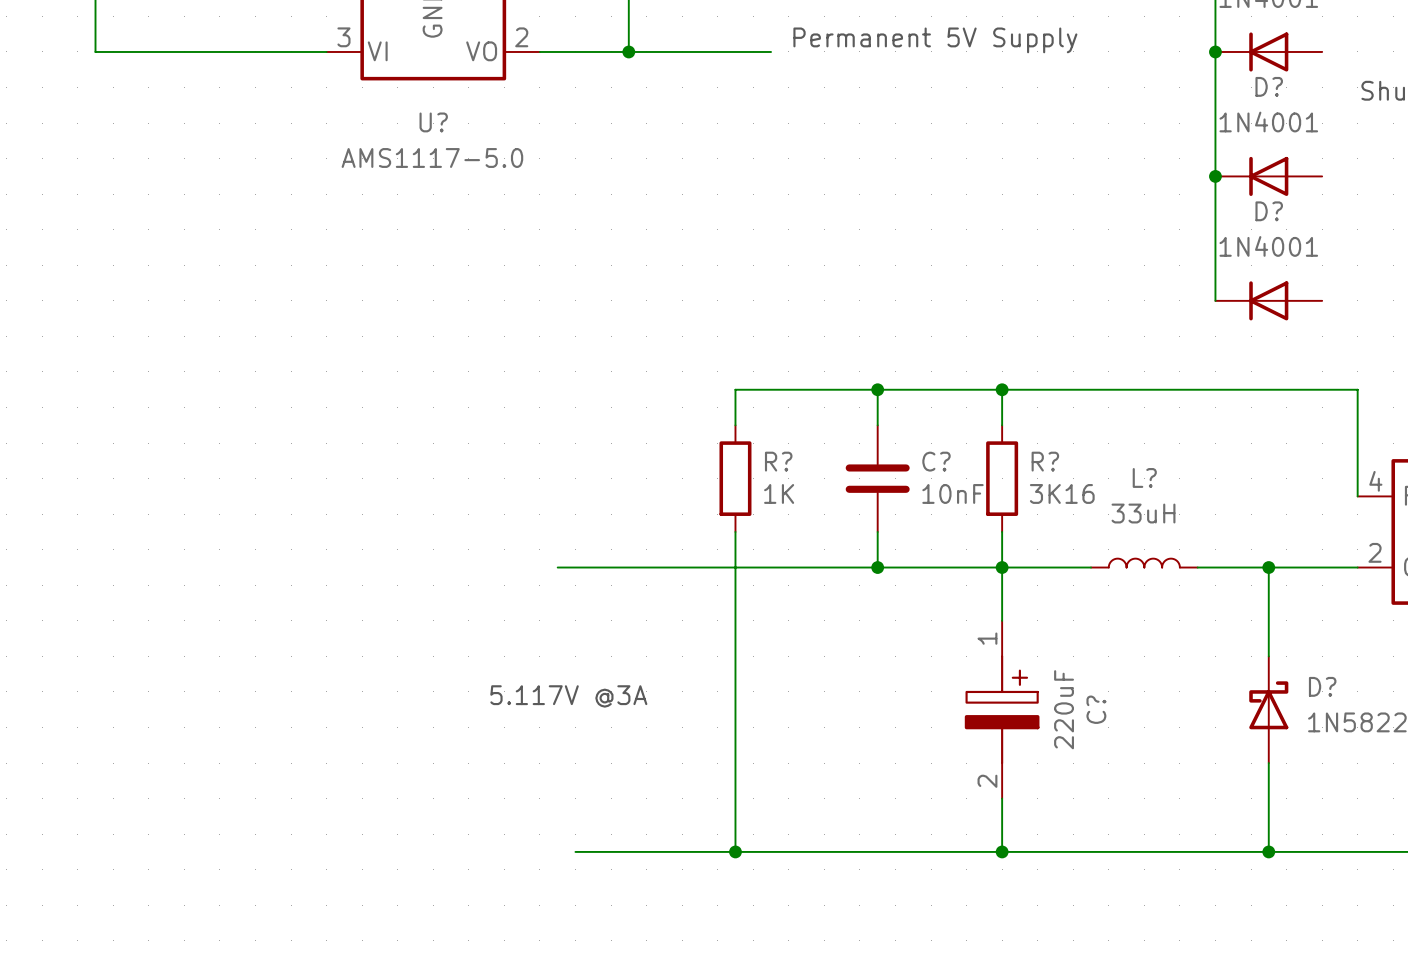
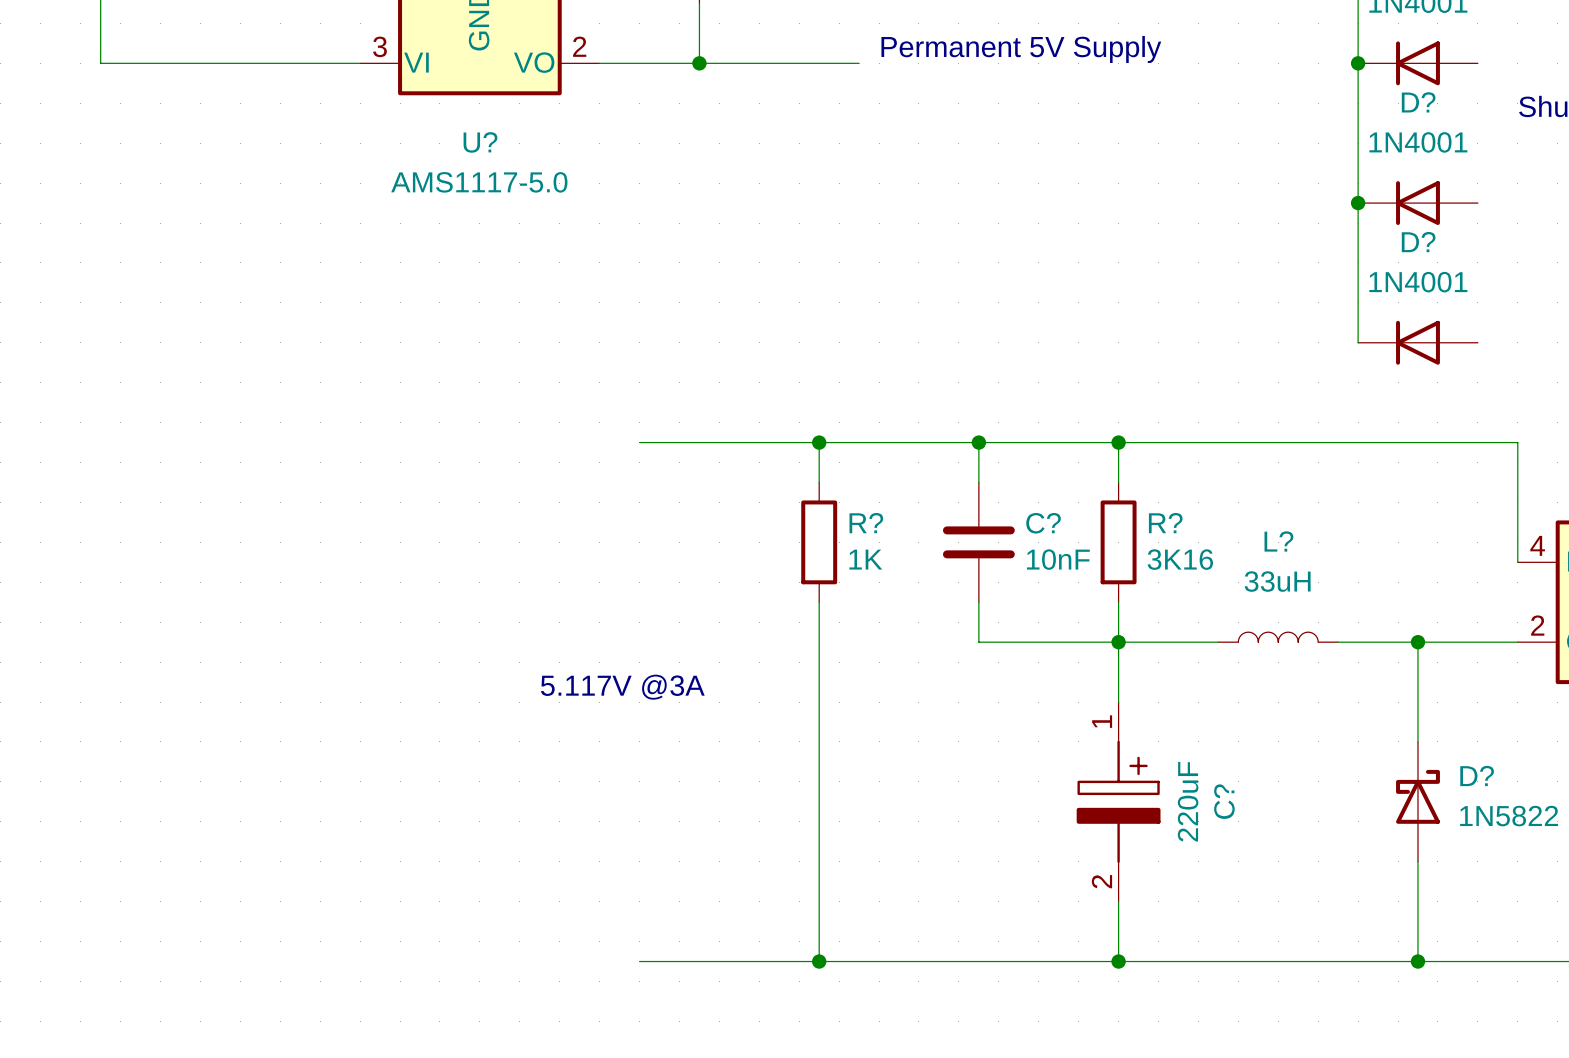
wire: none -> (639, 442) (819, 442)
junction: none -> (819, 442)
wire: (557, 567) (877, 567) -> none
junction: (877, 567) -> none
text position: 5.117V @3A (568, 696) -> 5.117V @3A (622, 687)

